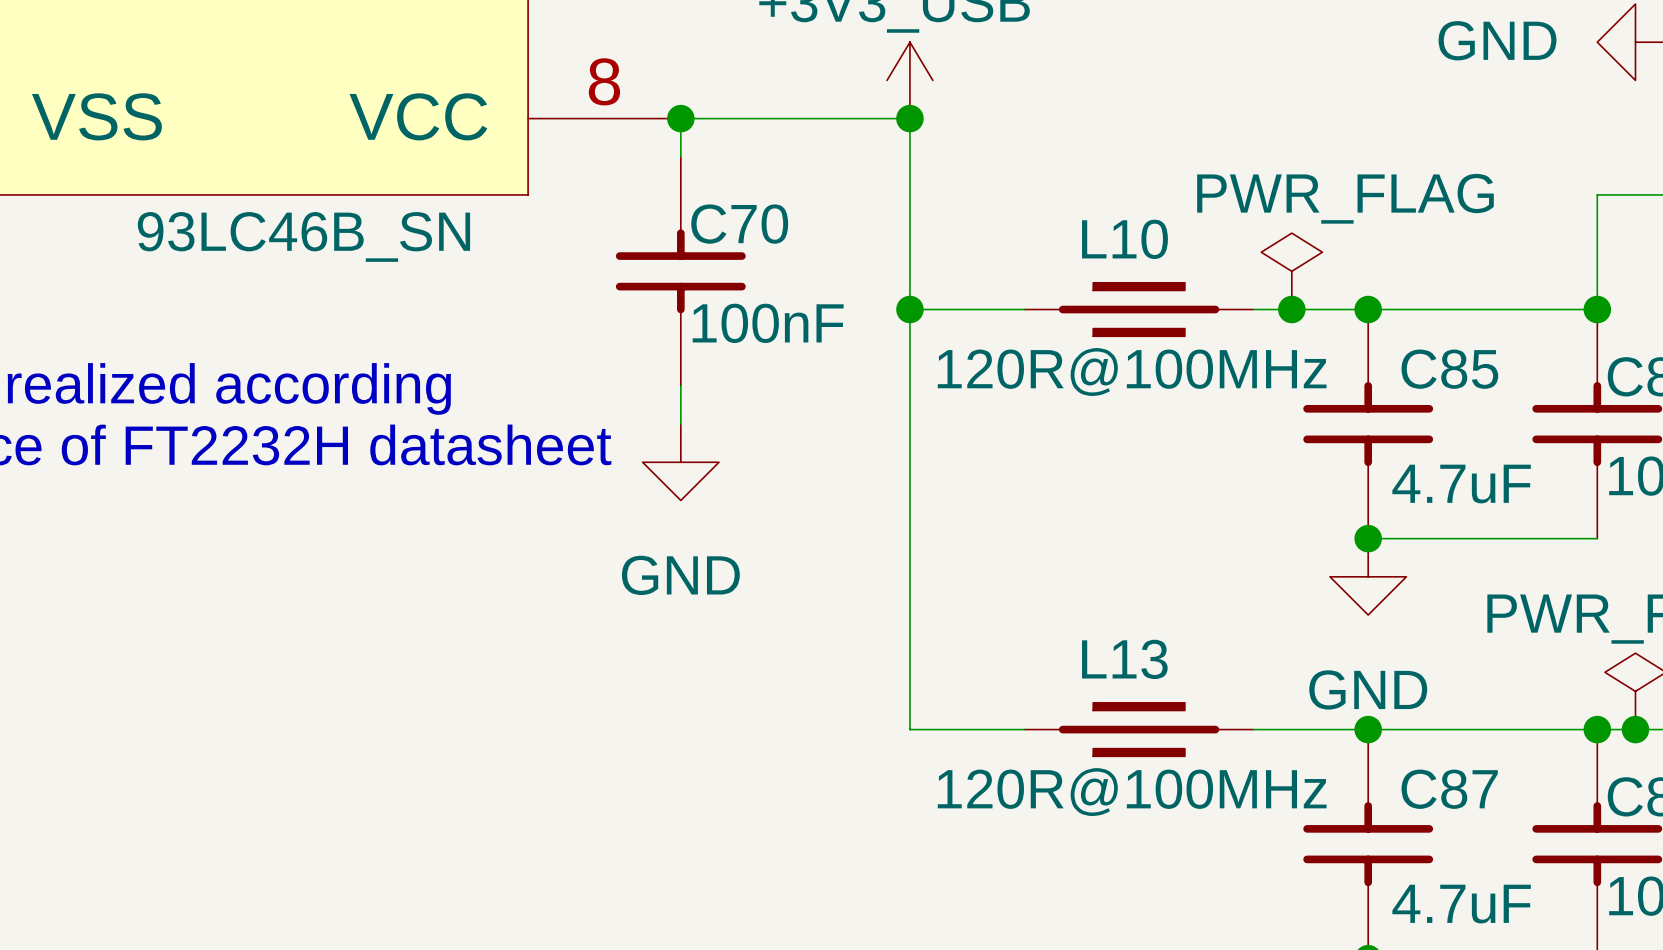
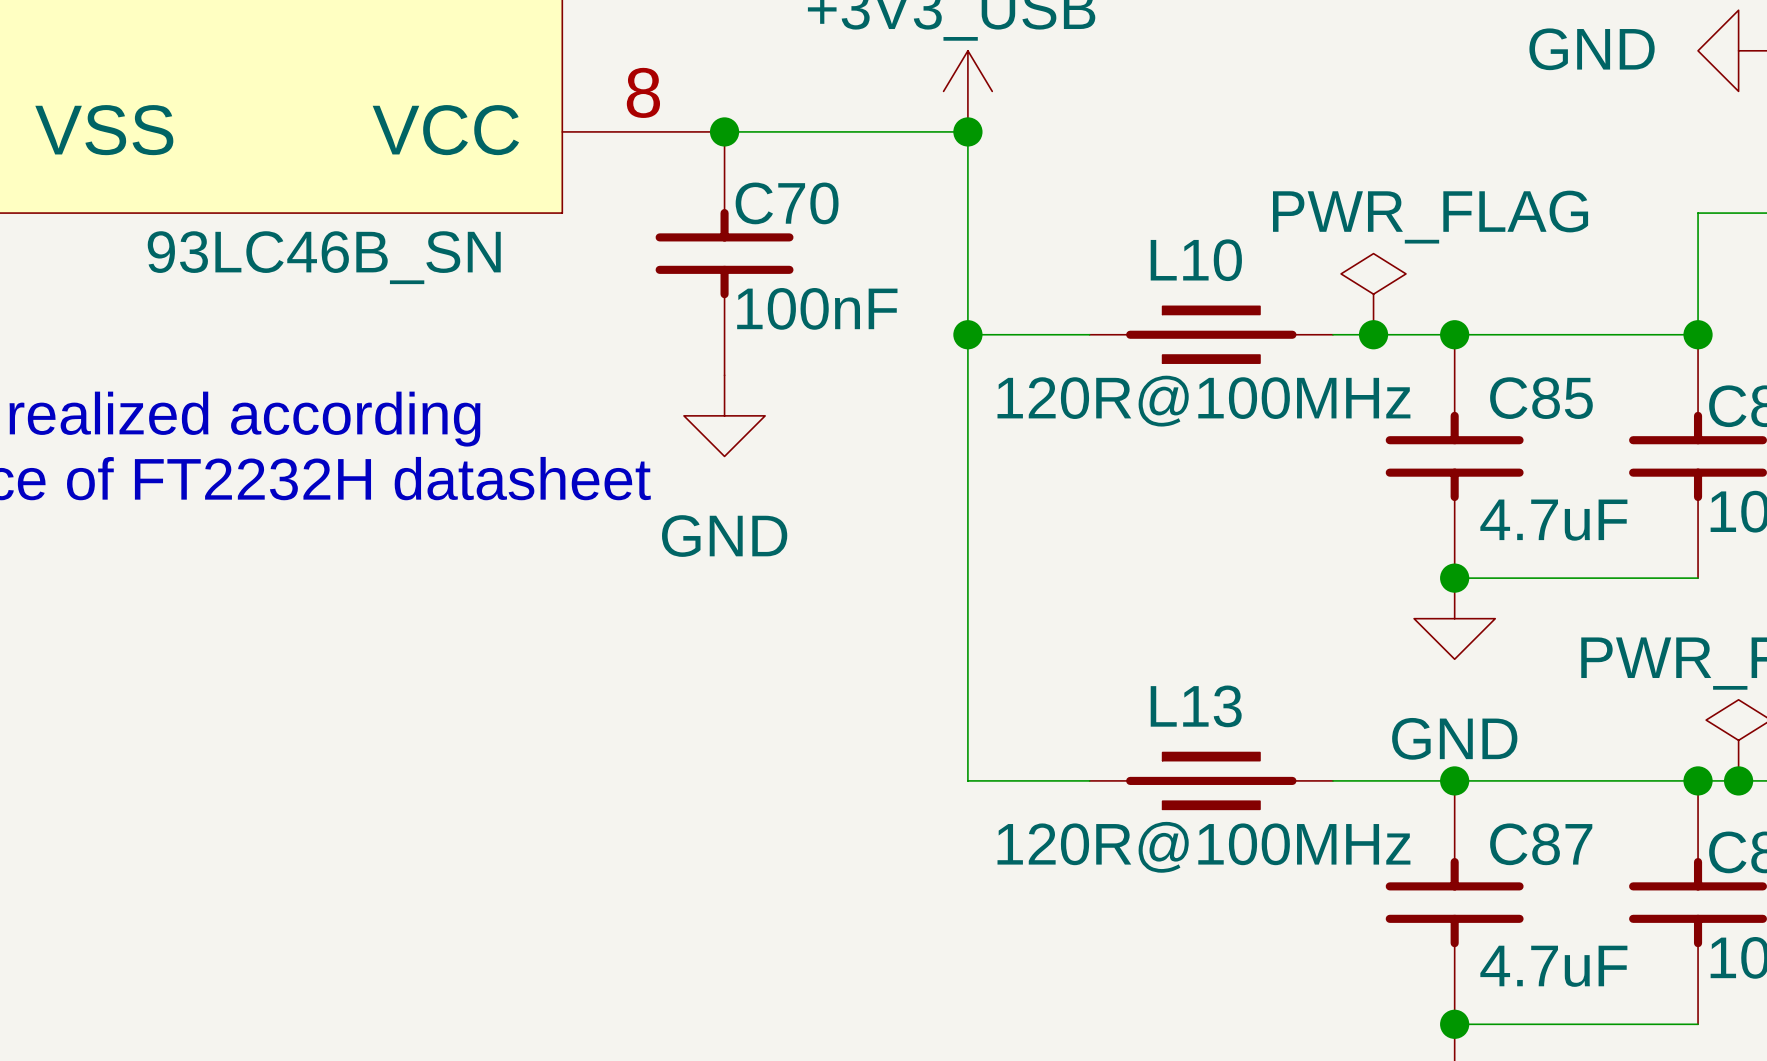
C70 position: (680, 271) -> (724, 253)
wire: (680, 385) (680, 424) -> none
power symbol position: GND (680, 462) -> GND (724, 415)

